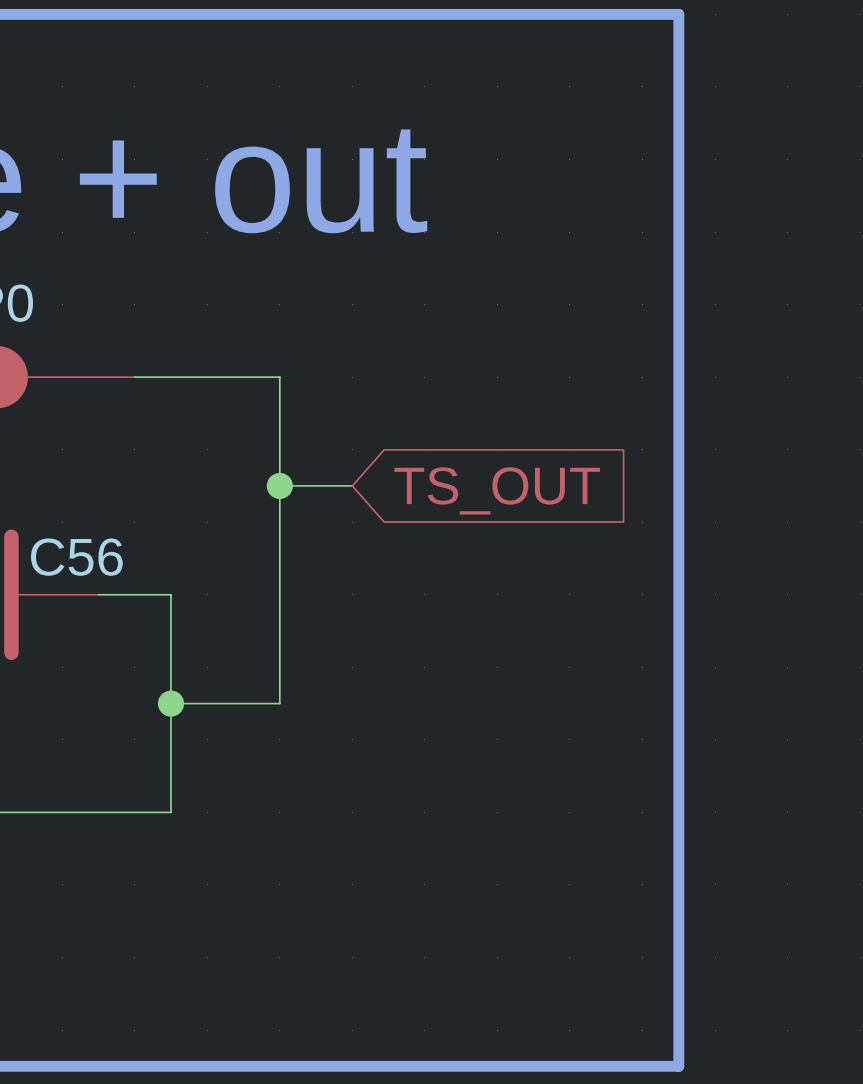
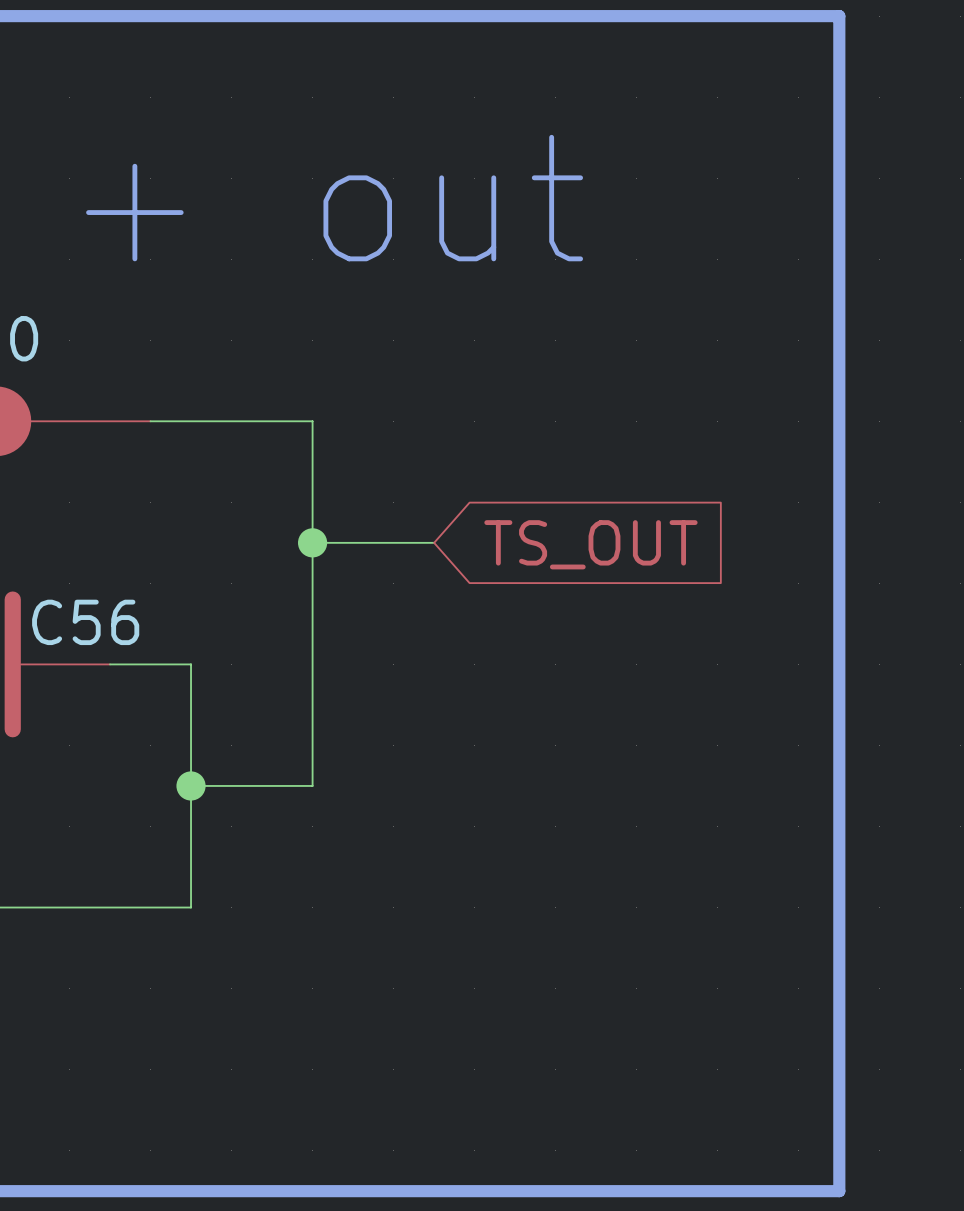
line: (678, 14) (678, 1066) -> (758, 16) (839, 16) (839, 1191) (758, 1191)
wire: none -> (393, 542) (434, 542)
global label position: TS_OUT (497, 490) -> TS_OUT (590, 544)

